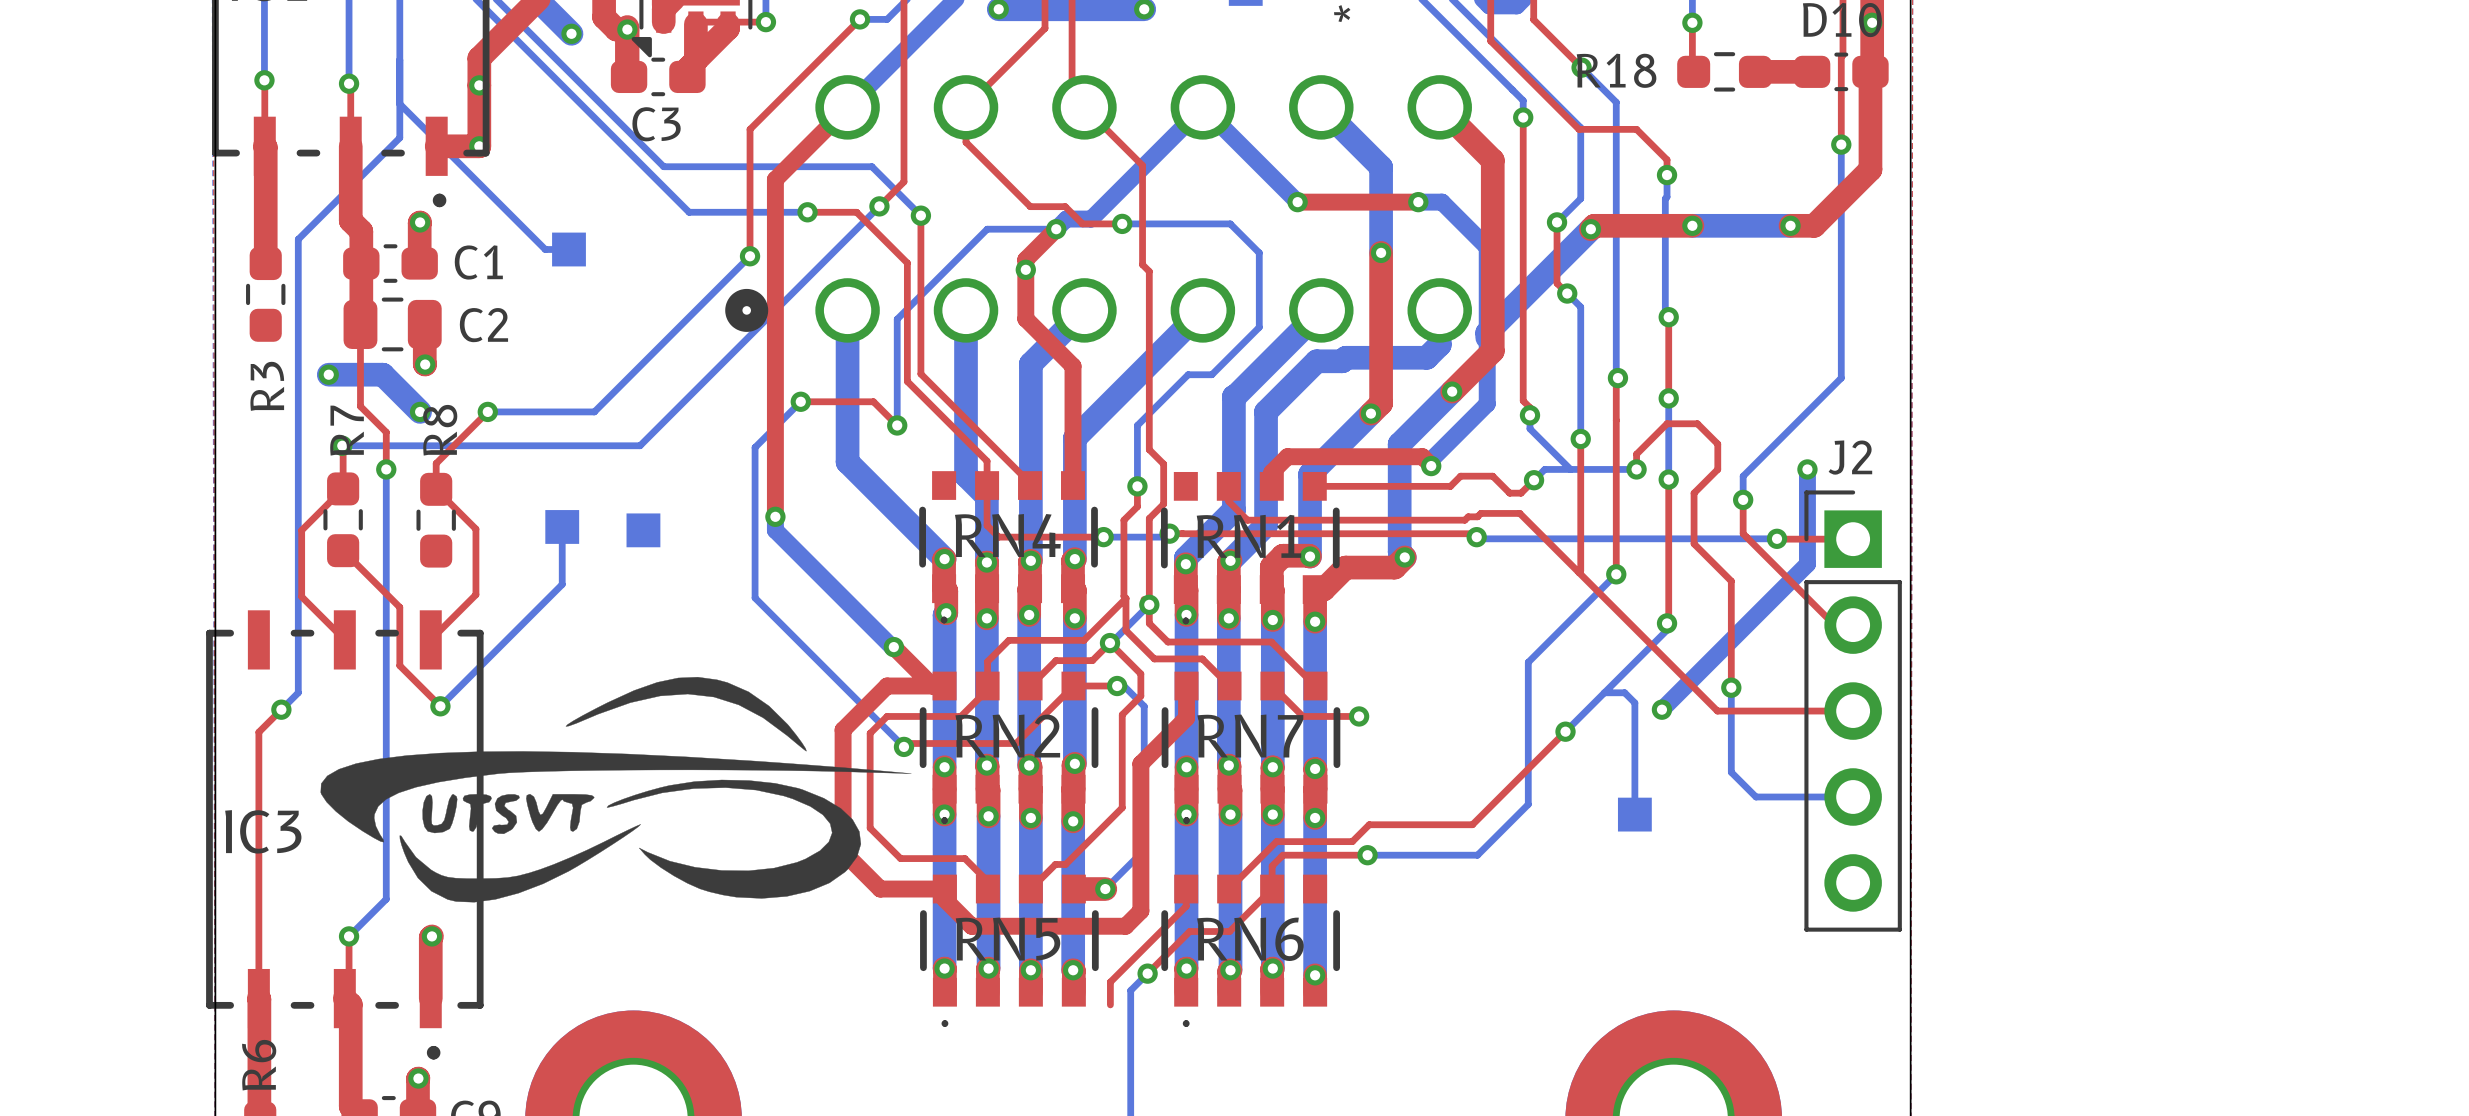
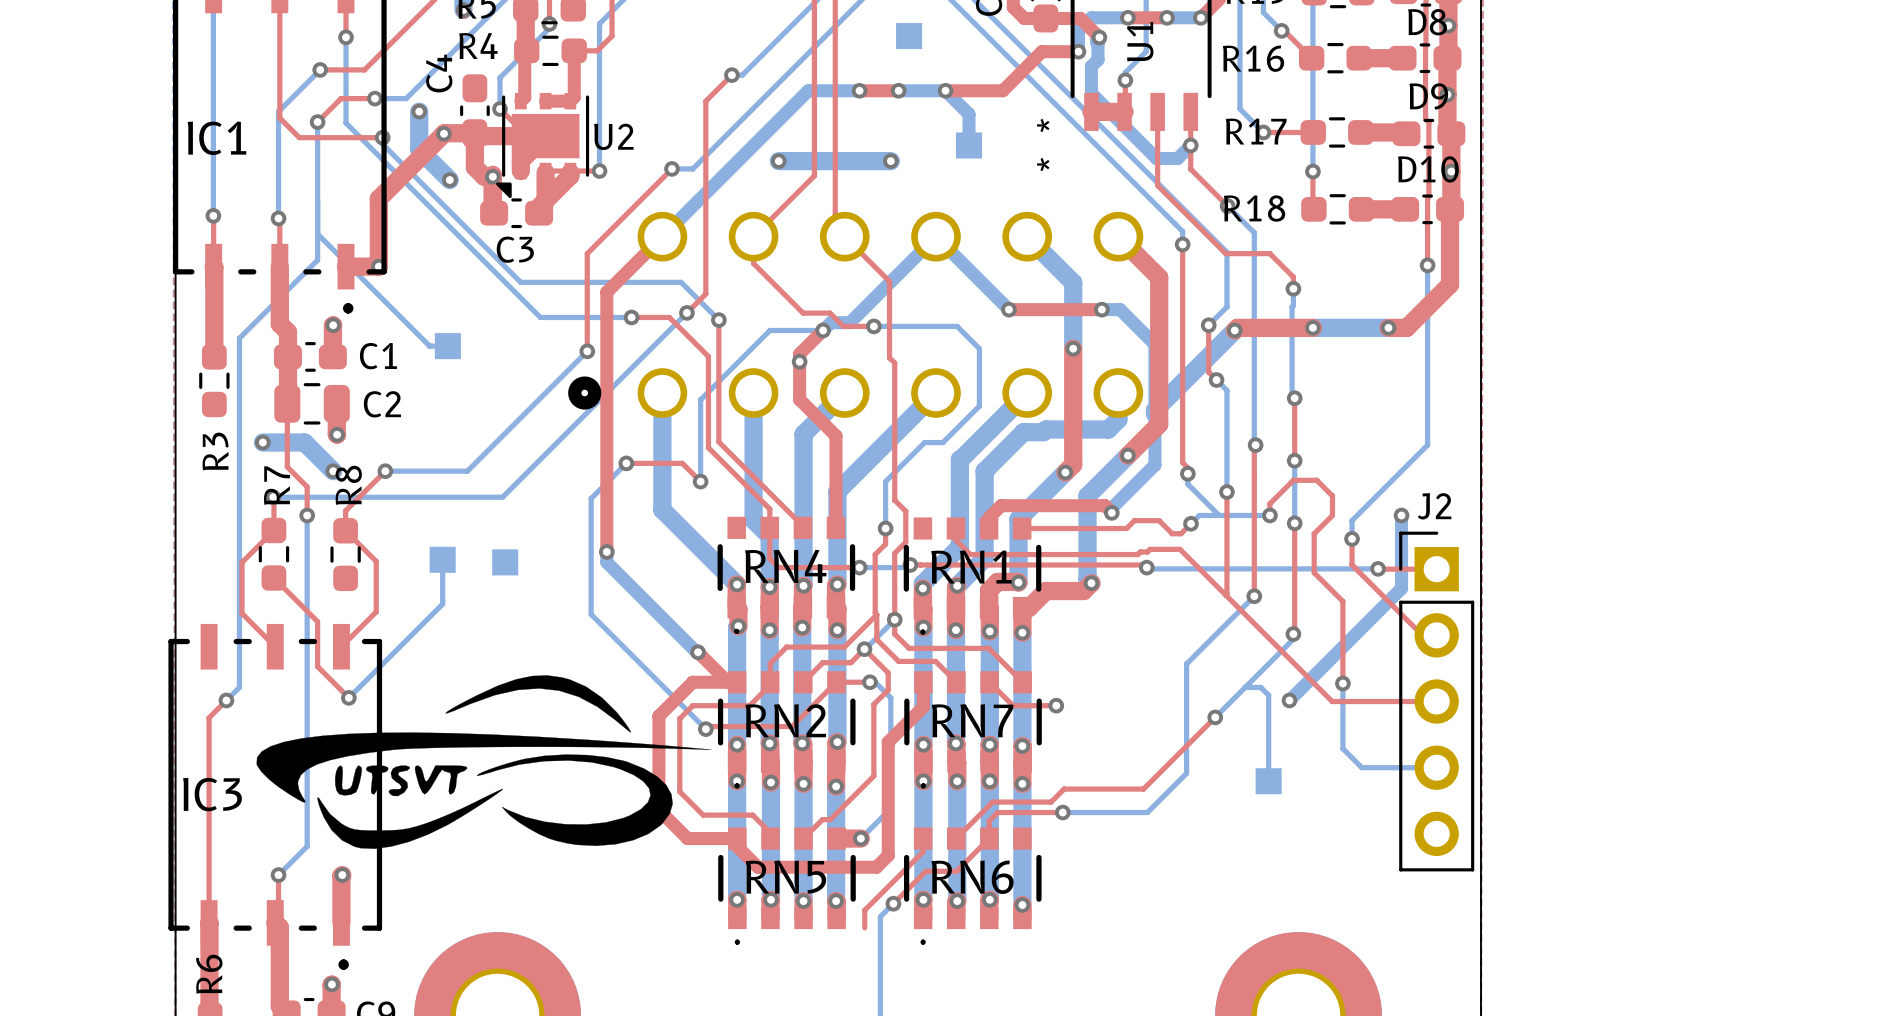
via: (479, 85) -> none

